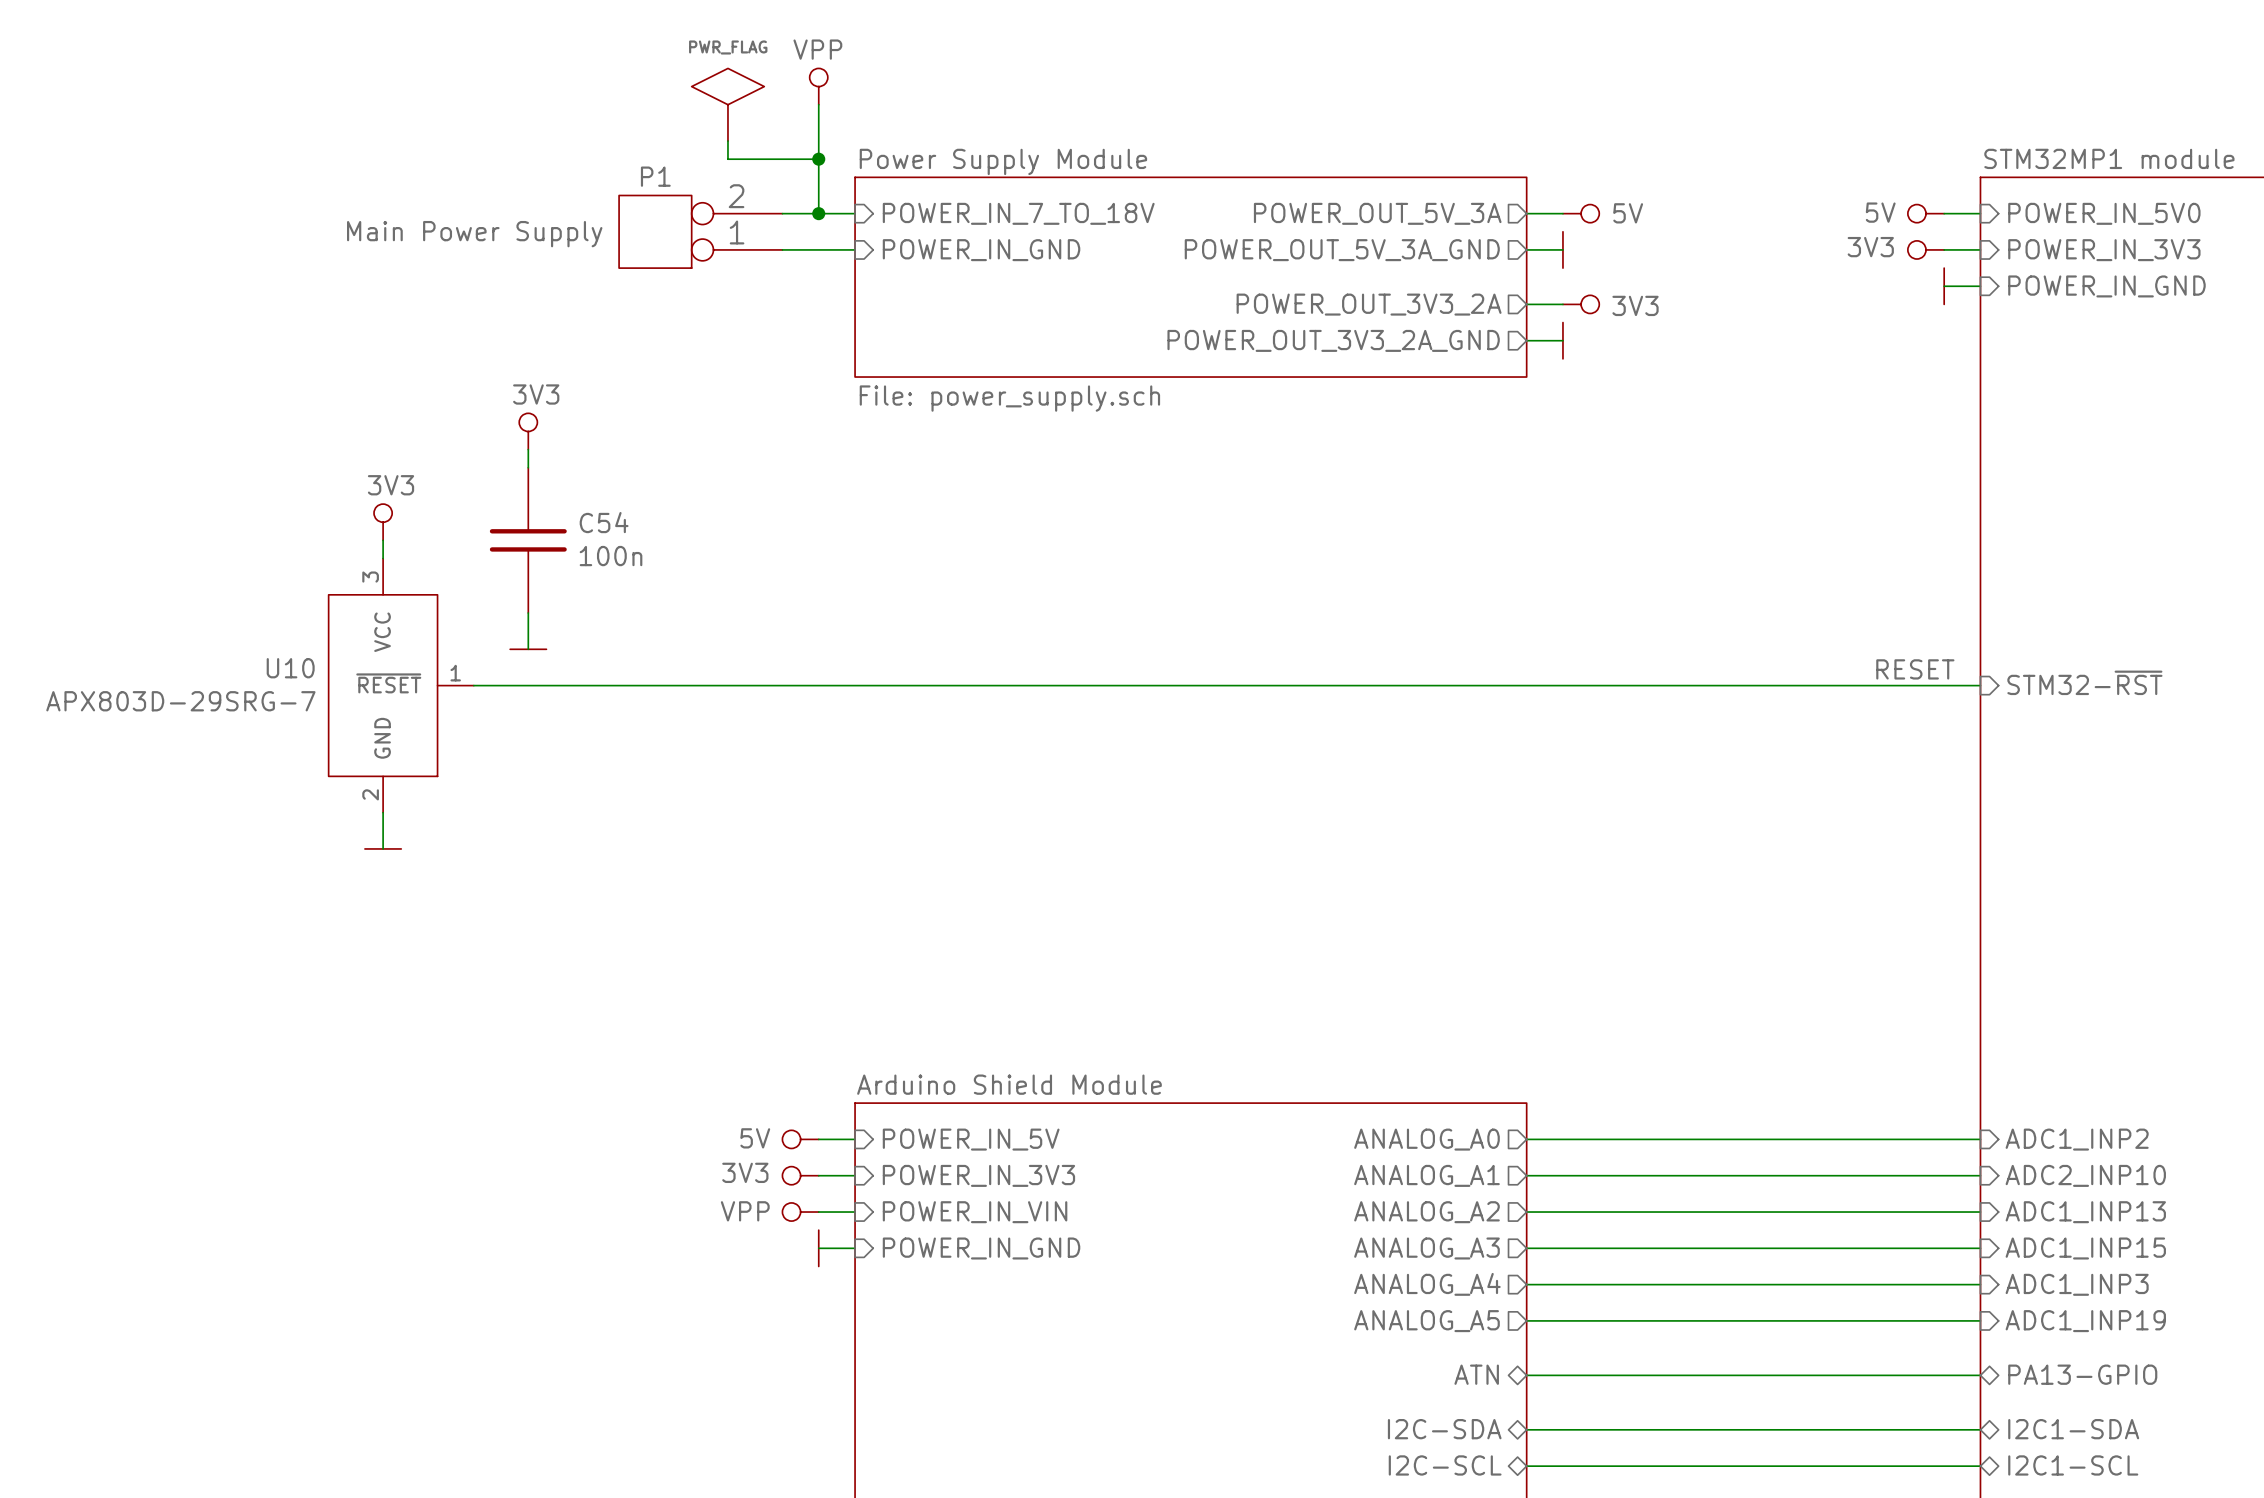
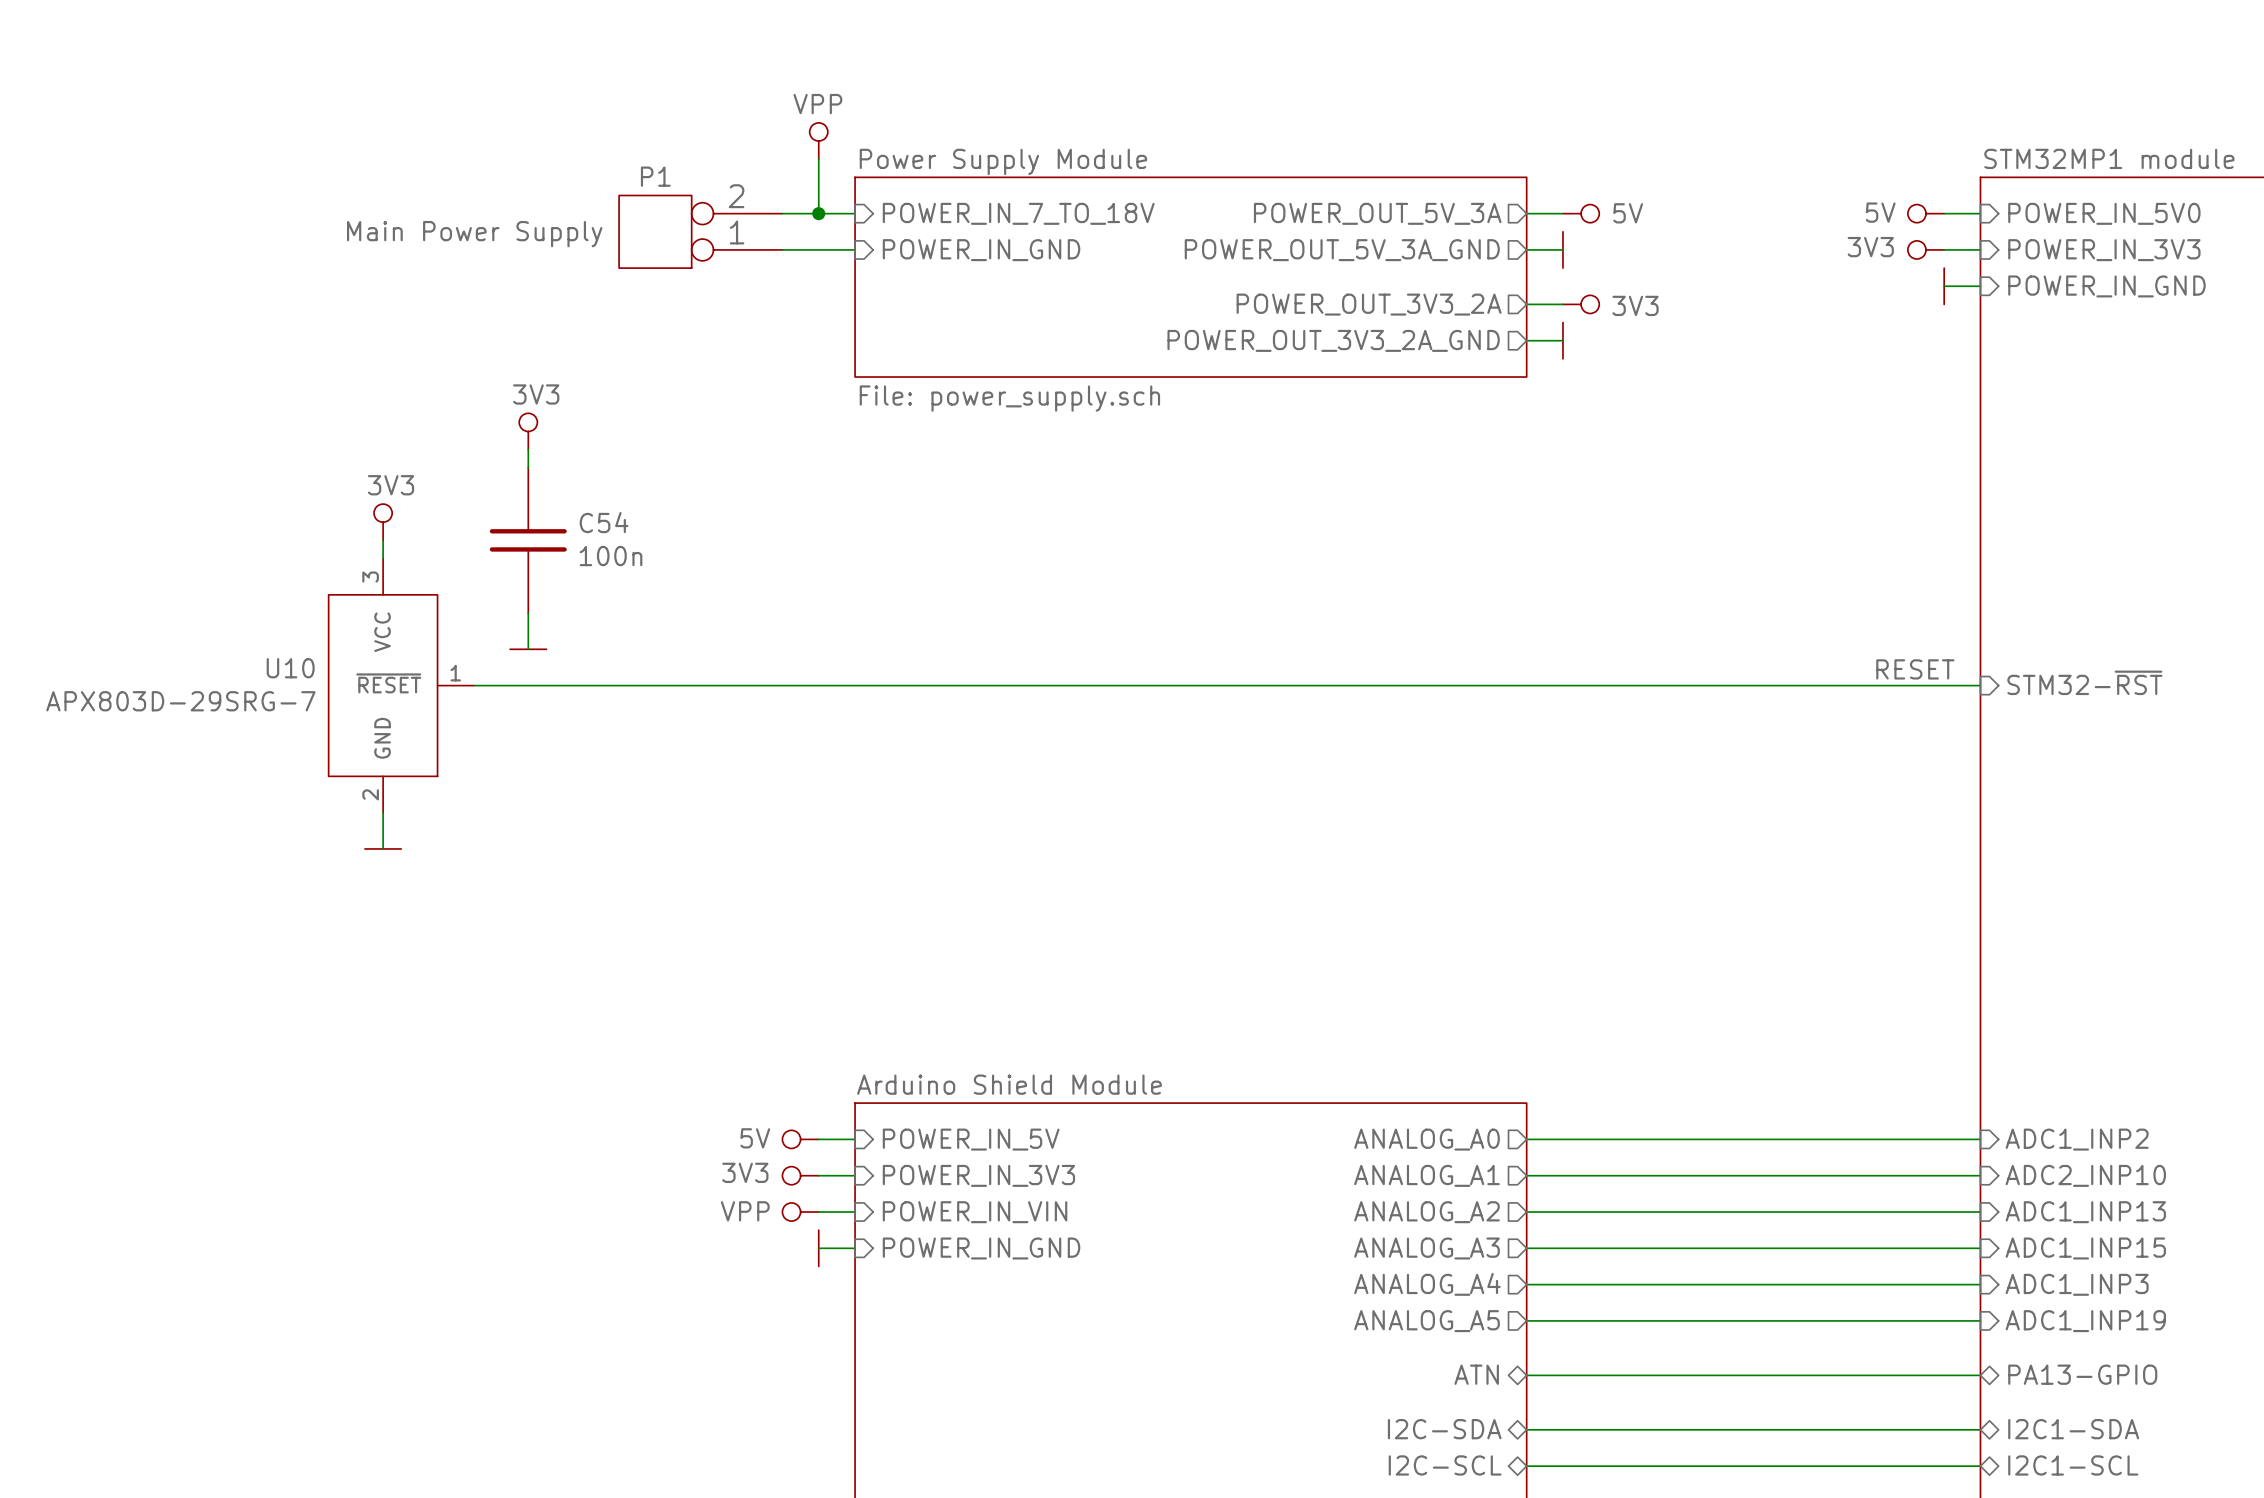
power symbol position: VPP (818, 86) -> VPP (818, 141)
power symbol: PWR_FLAG (727, 104) -> none
wire: (818, 104) (818, 159) (727, 159) (727, 141) -> none
junction: (818, 159) -> none

